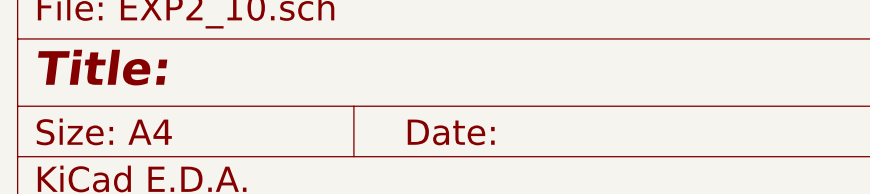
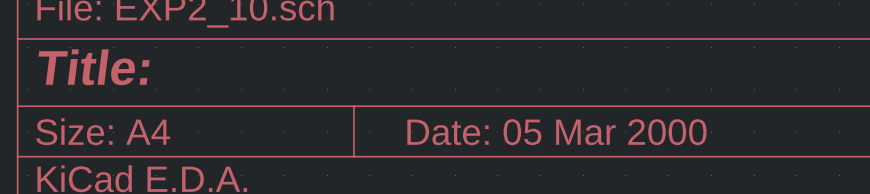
title block: Date: (451, 132) -> Date: 05 Mar 2000 (556, 132)

